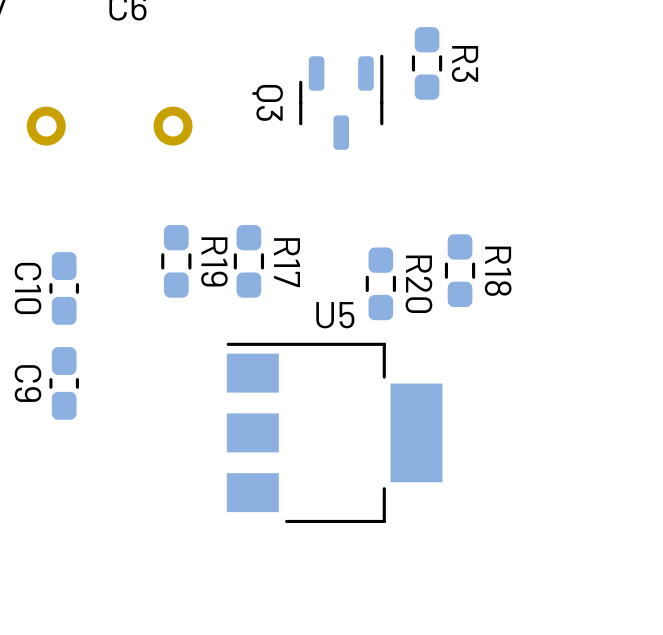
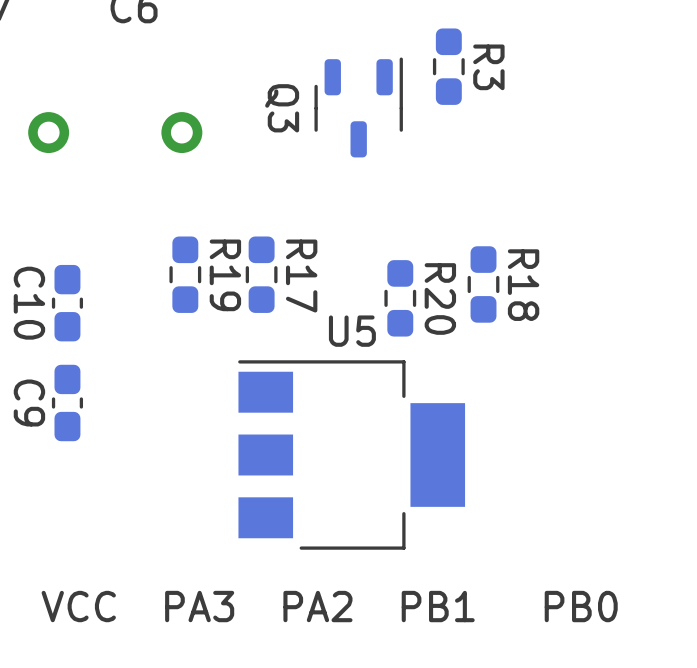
text: none -> VCC PA3 PA2 PB1 PB0 (329, 606)

